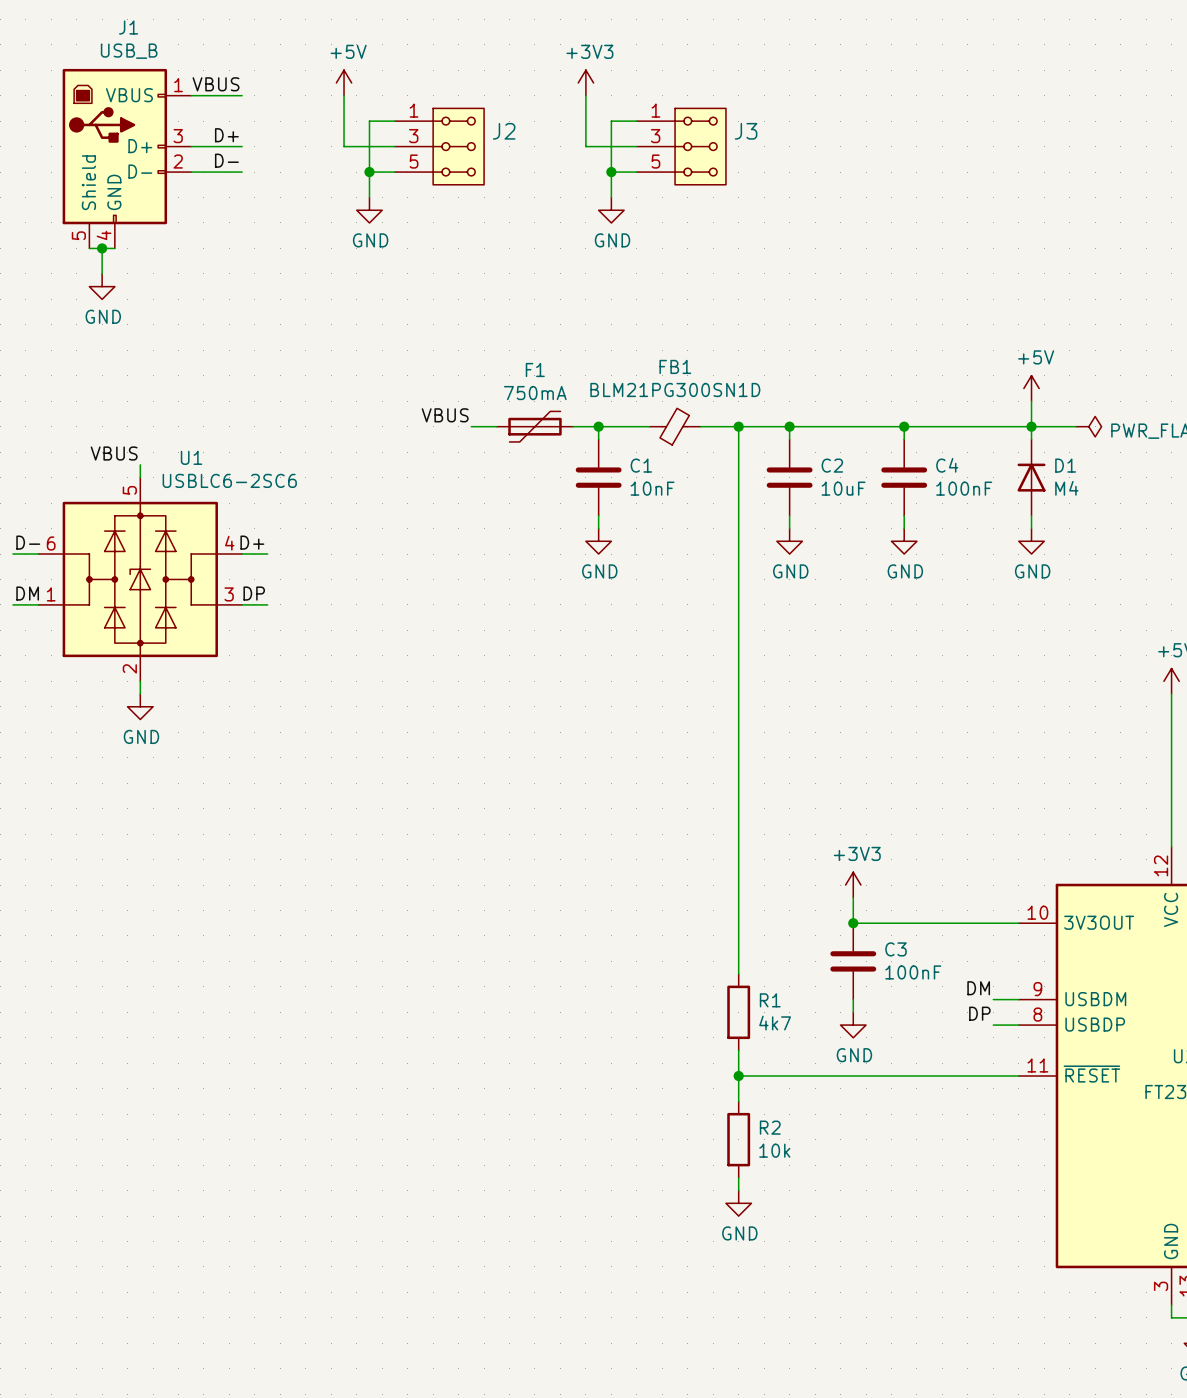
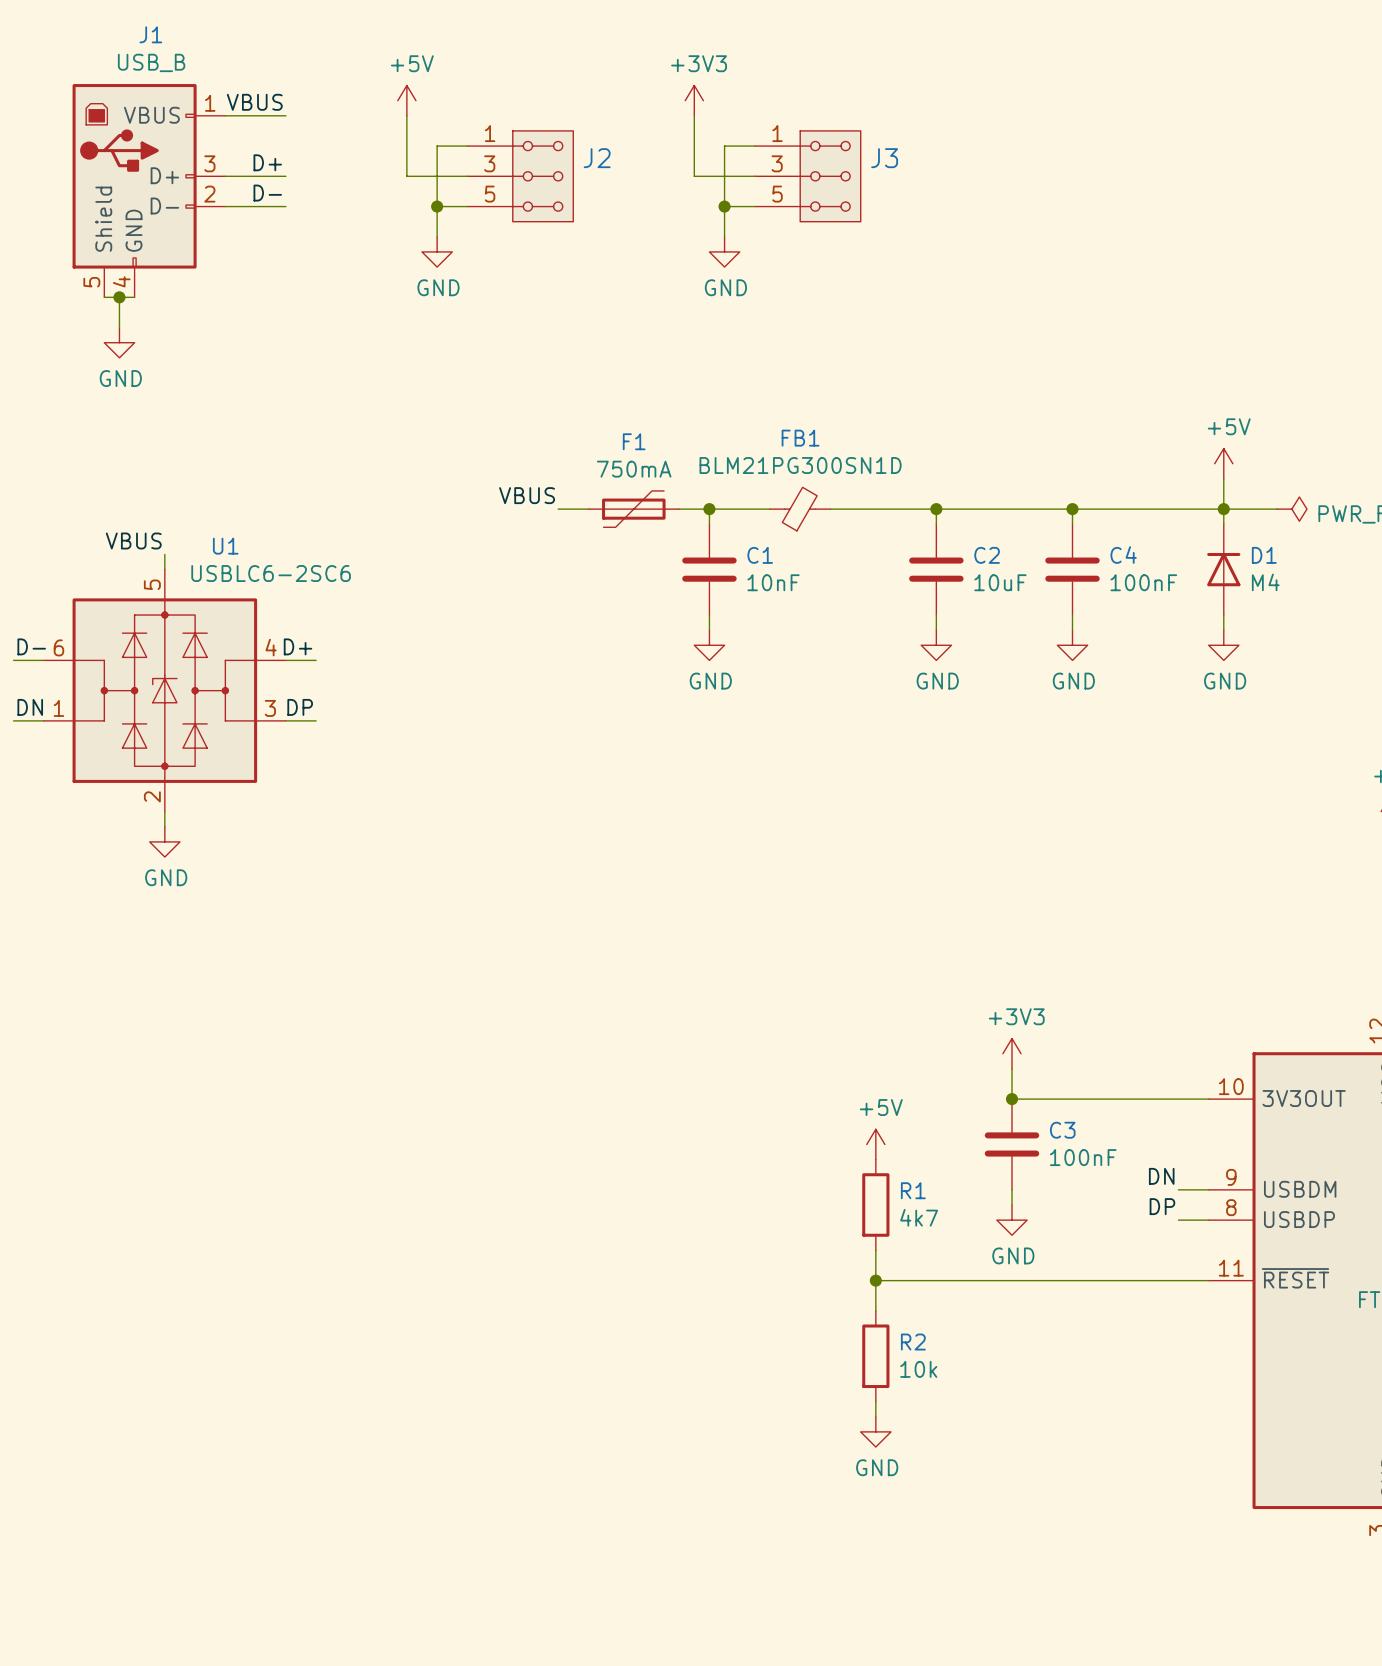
wire: (738, 426) (738, 974) -> none
junction: (738, 426) -> none
label: DM (27, 593) -> DN (30, 707)
power symbol: none -> +5V (875, 1144)
label: DM (978, 988) -> DN (1161, 1176)

